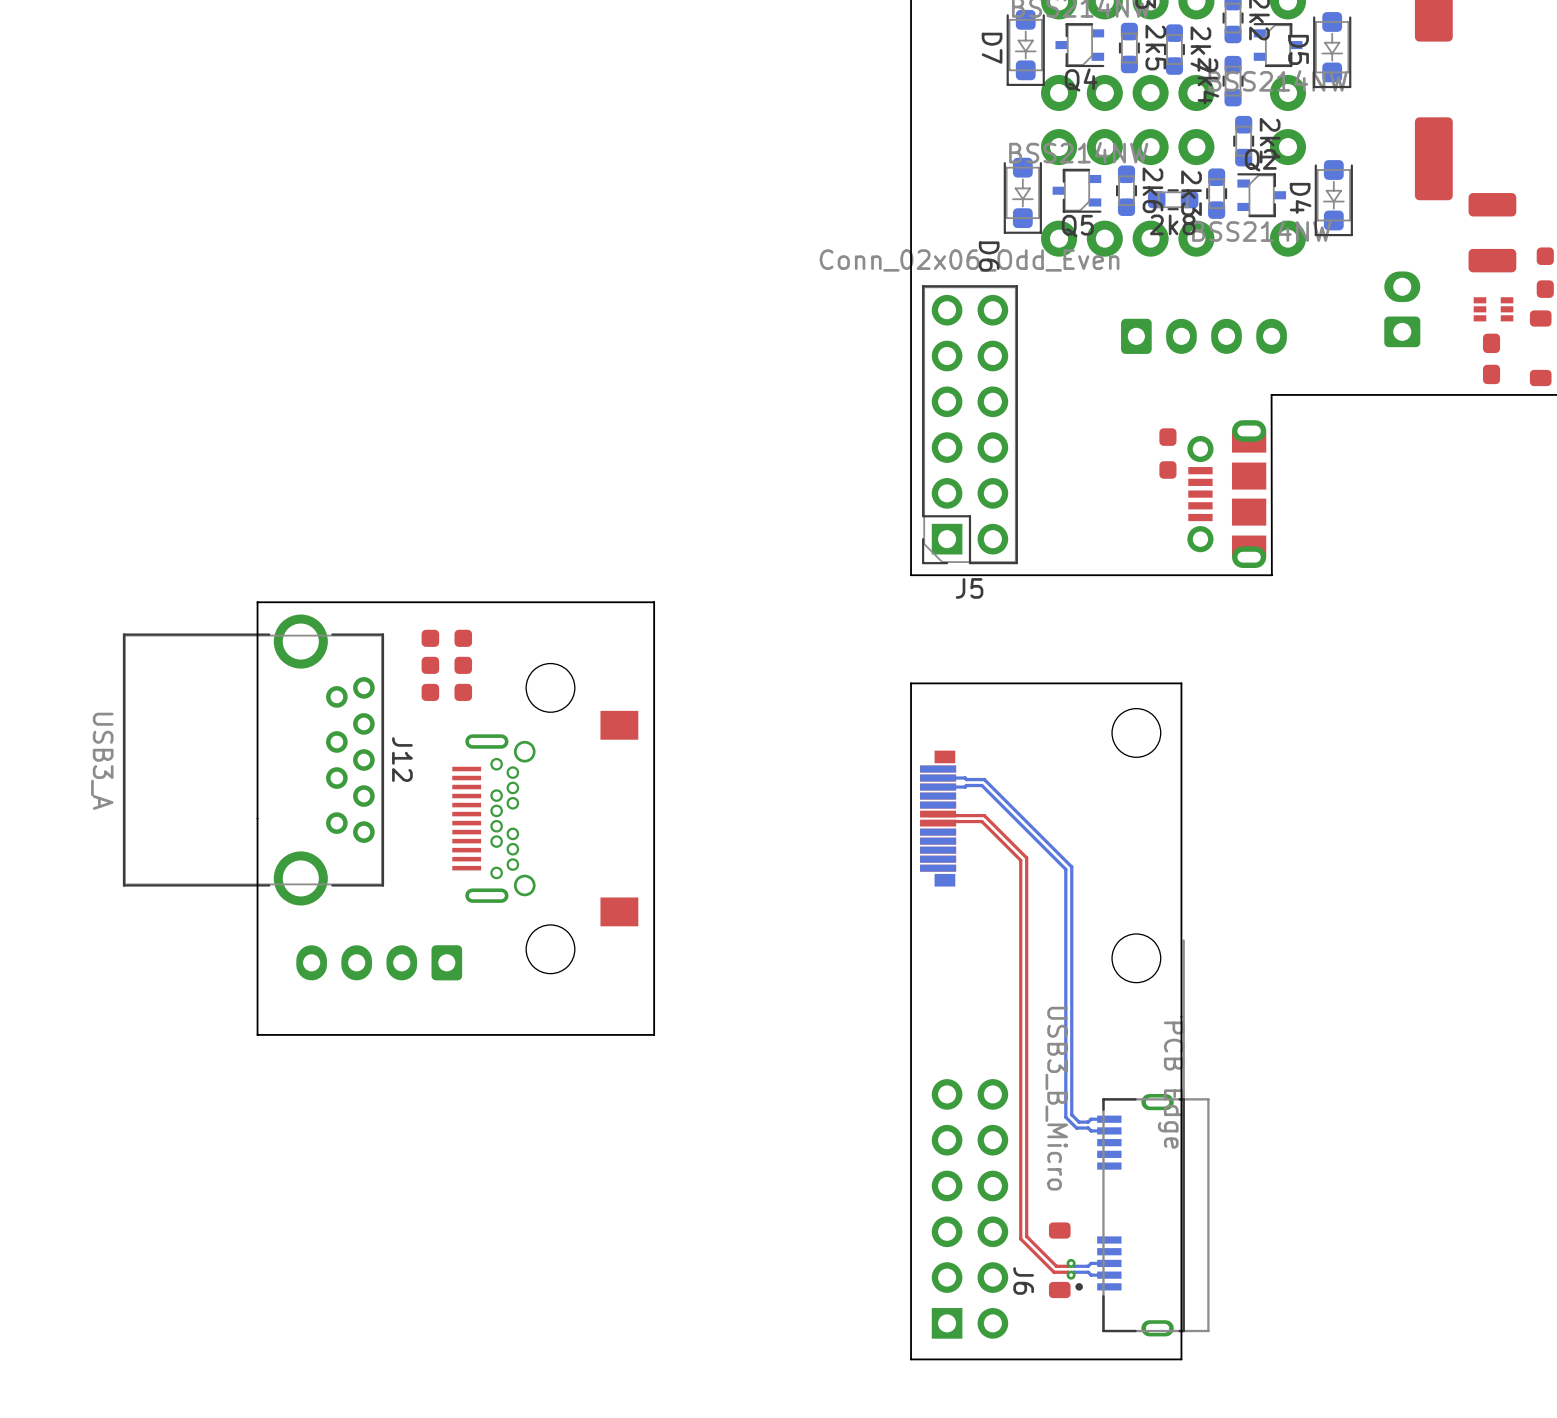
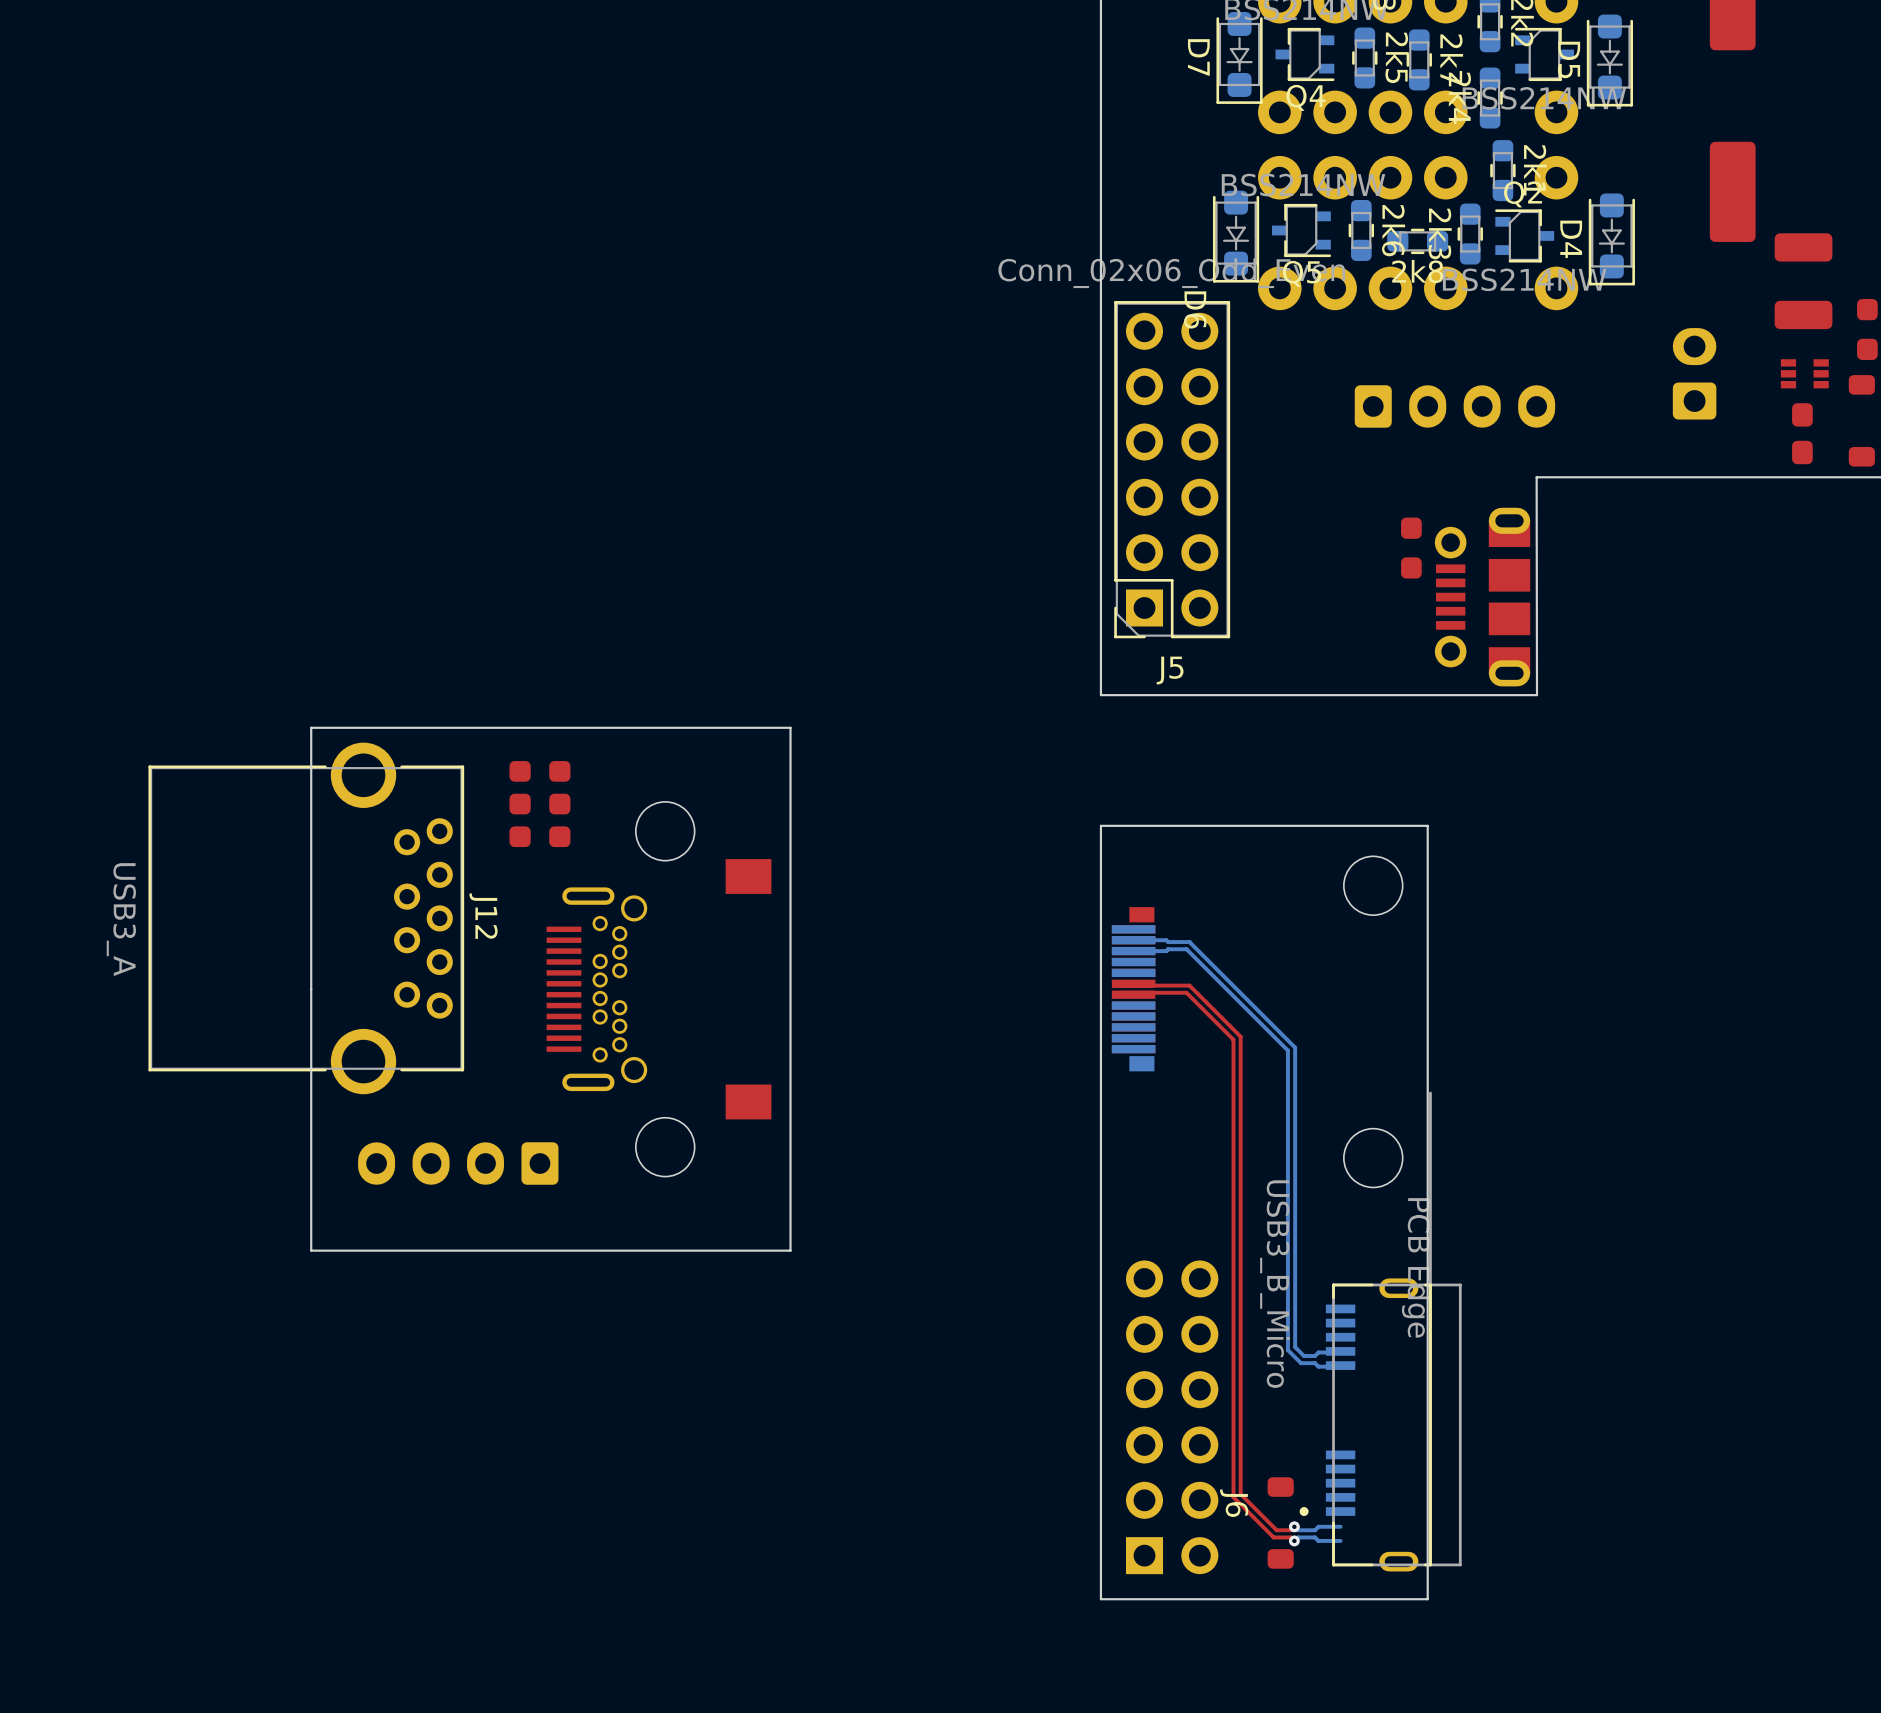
J5 position: (969, 424) -> (1172, 469)
J6 position: (1142, 1137) -> (1380, 1331)
part position: (969, 1208) -> (1172, 1417)
board edge: (1181, 1323) (1181, 1359) (911, 1359) (911, 1323) -> (1427, 1599) (1100, 1599)

